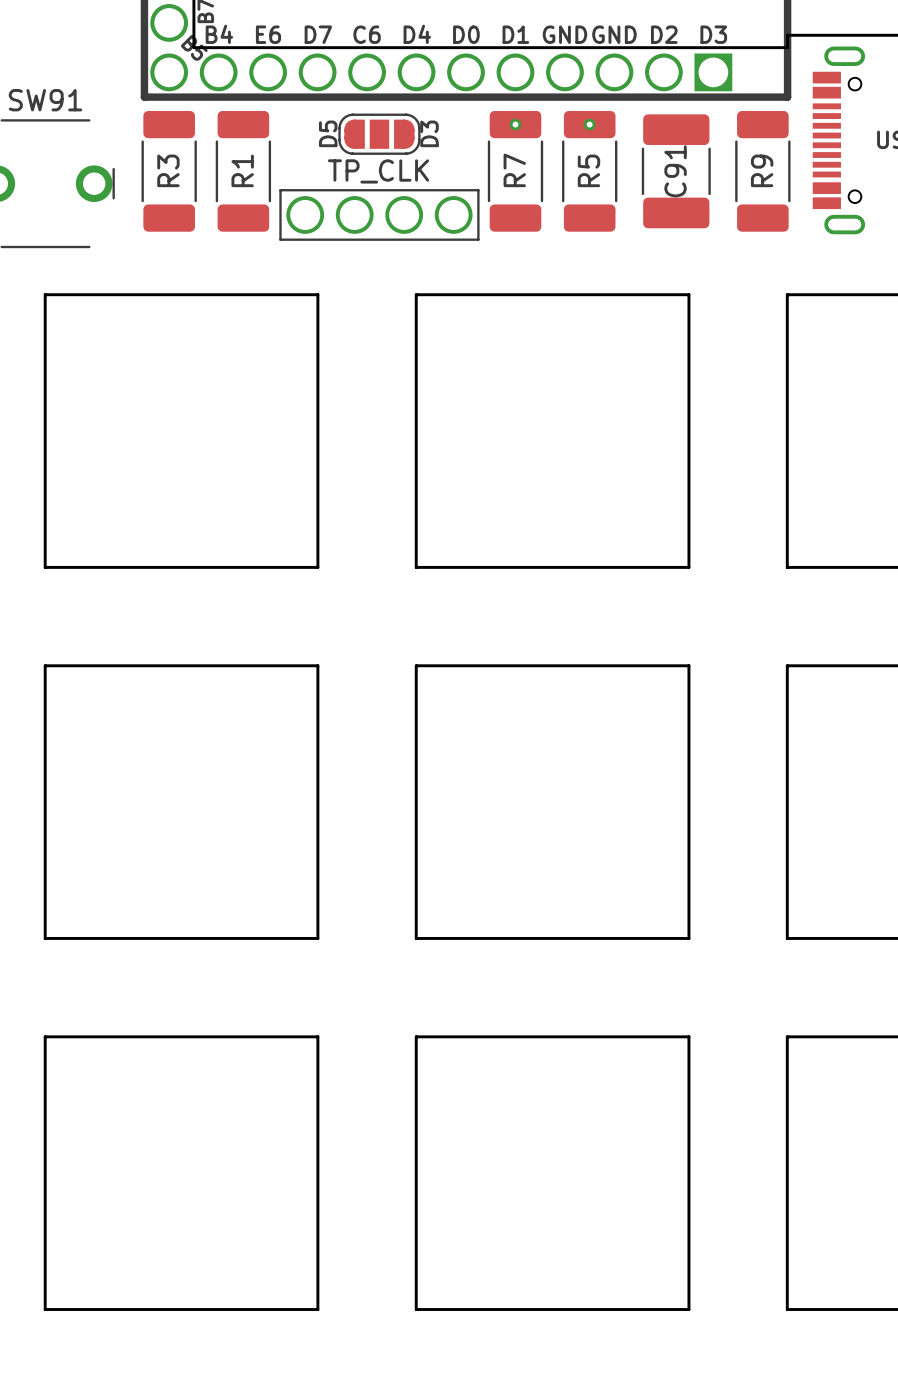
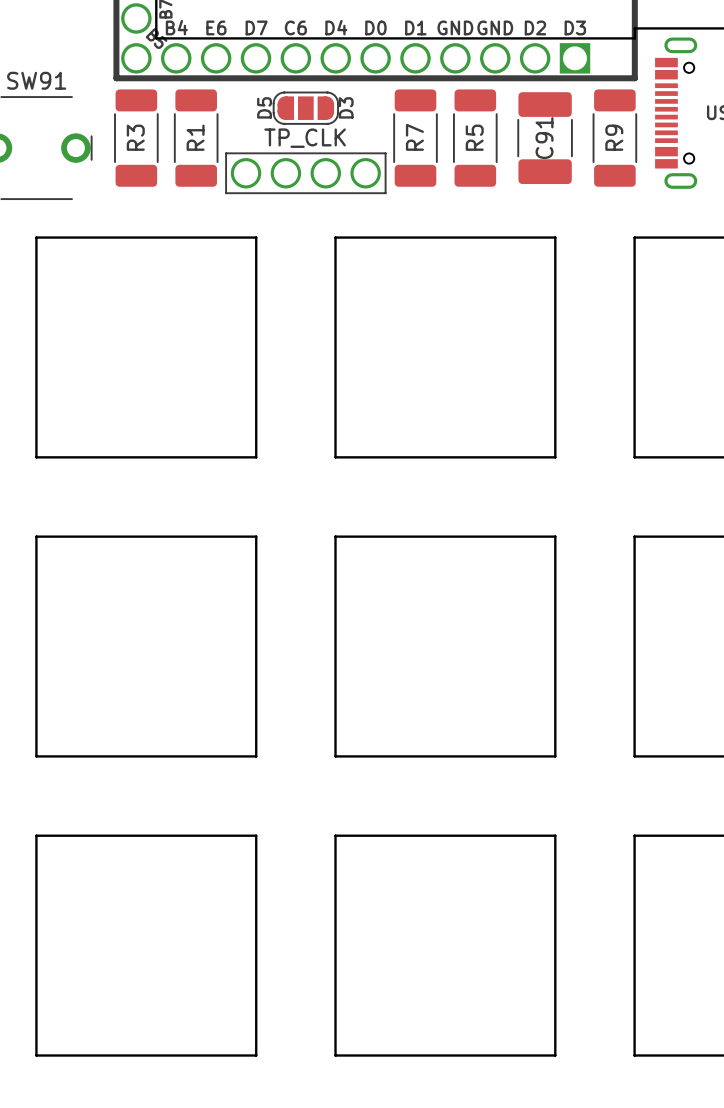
via: (515, 124) -> none
via: (589, 124) -> none

